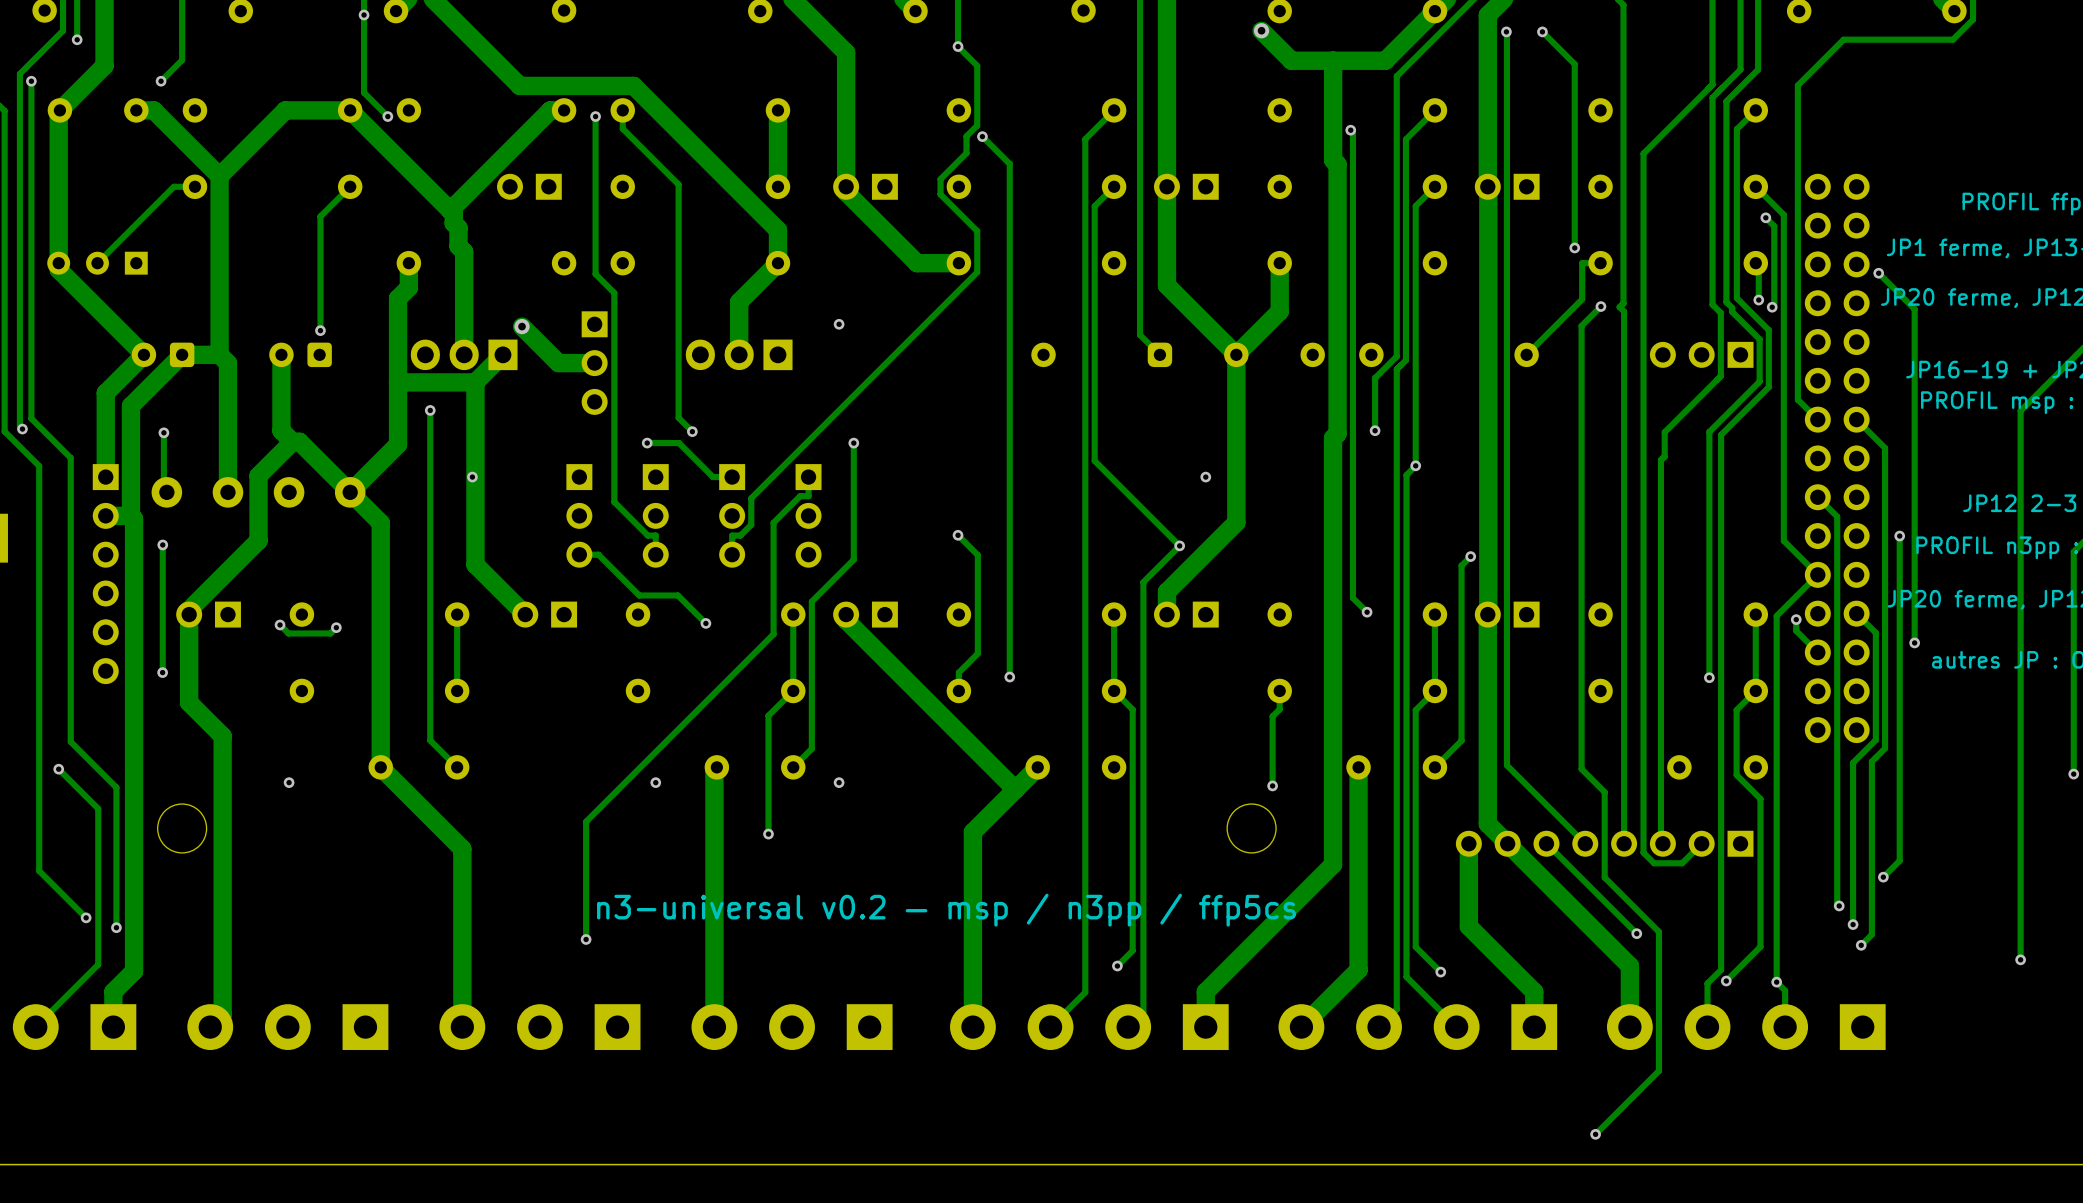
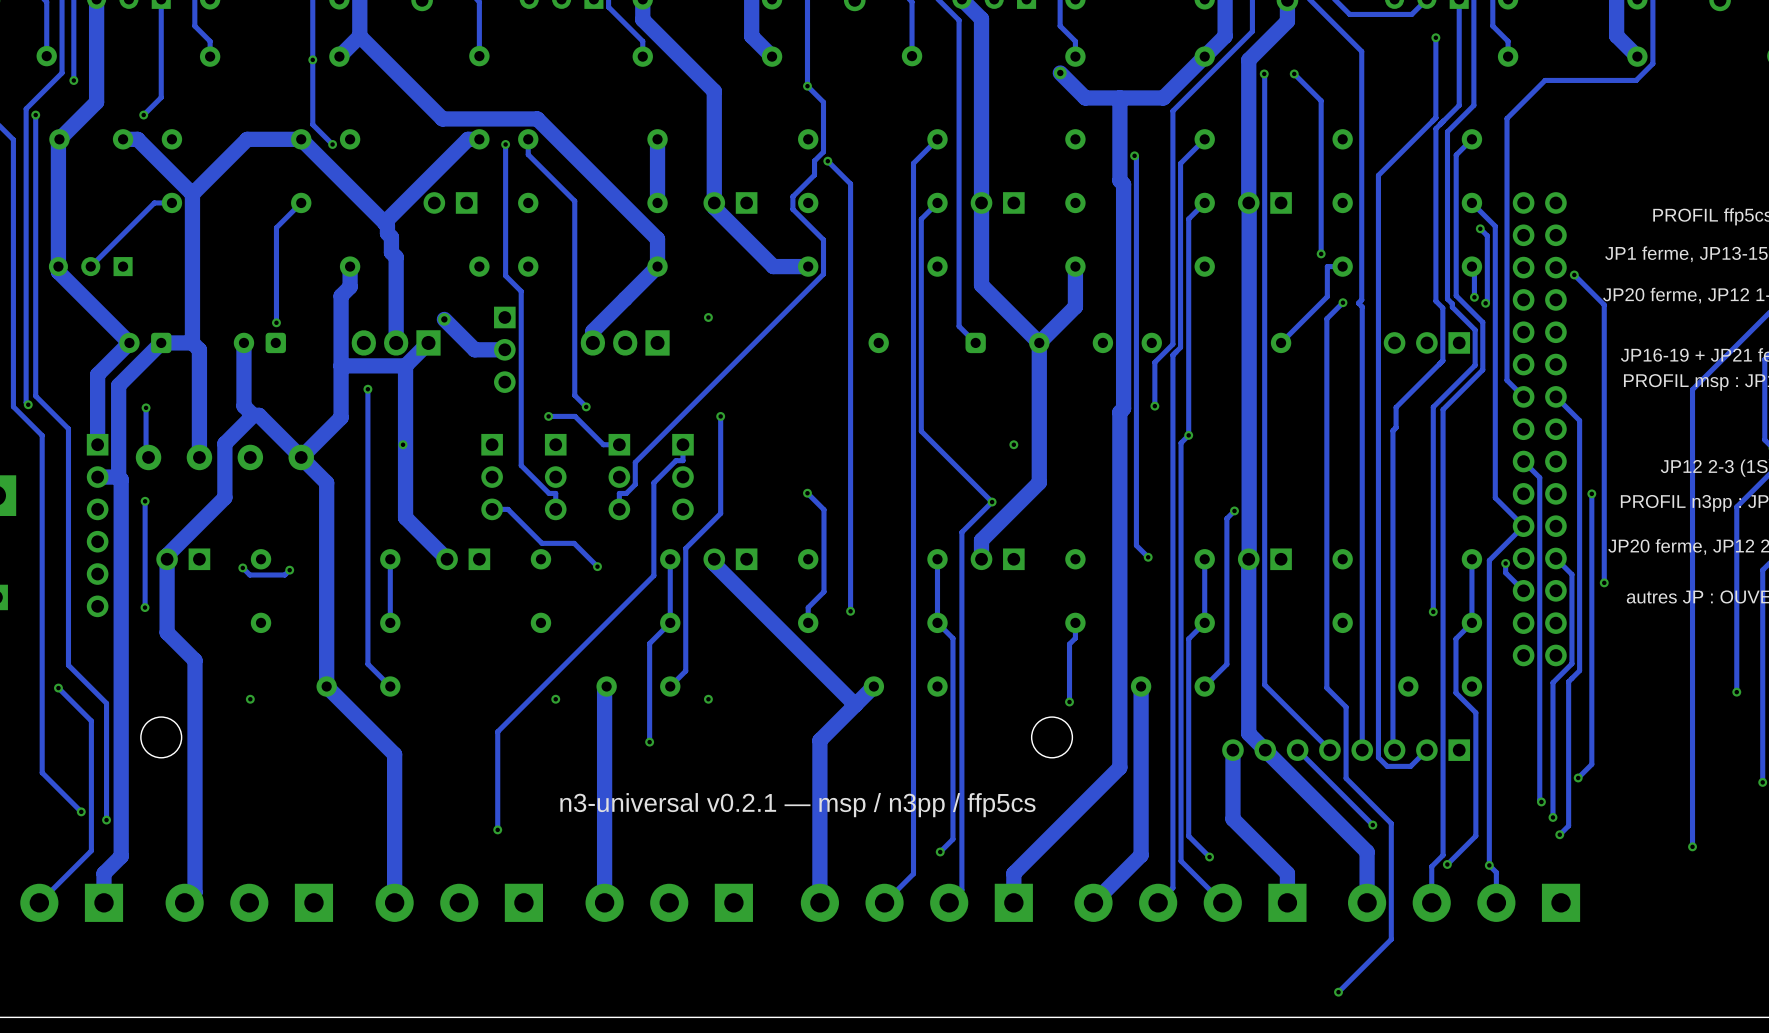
track: (739, 301) (739, 354) -> (625, 298) (592, 331) (592, 342)
text: n3-universal v0.2 — msp / n3pp / ffp5cs (946, 910) -> n3-universal v0.2.1 — msp / n3pp / ffp5cs (797, 805)

